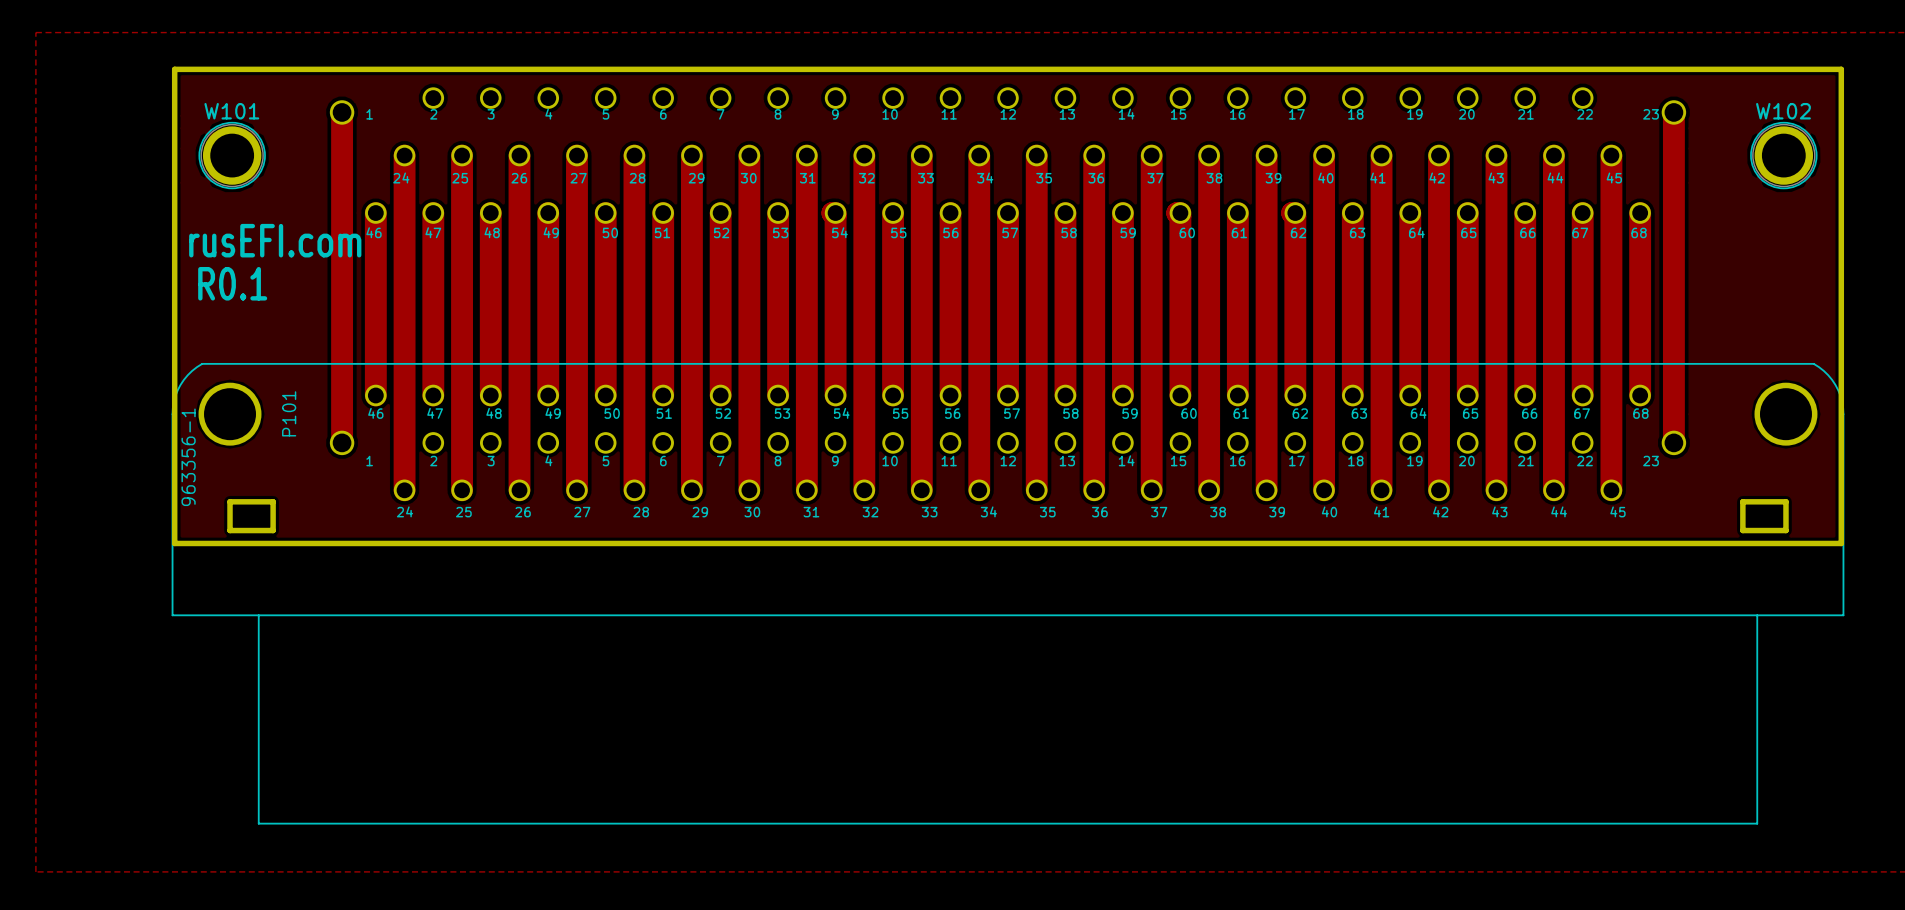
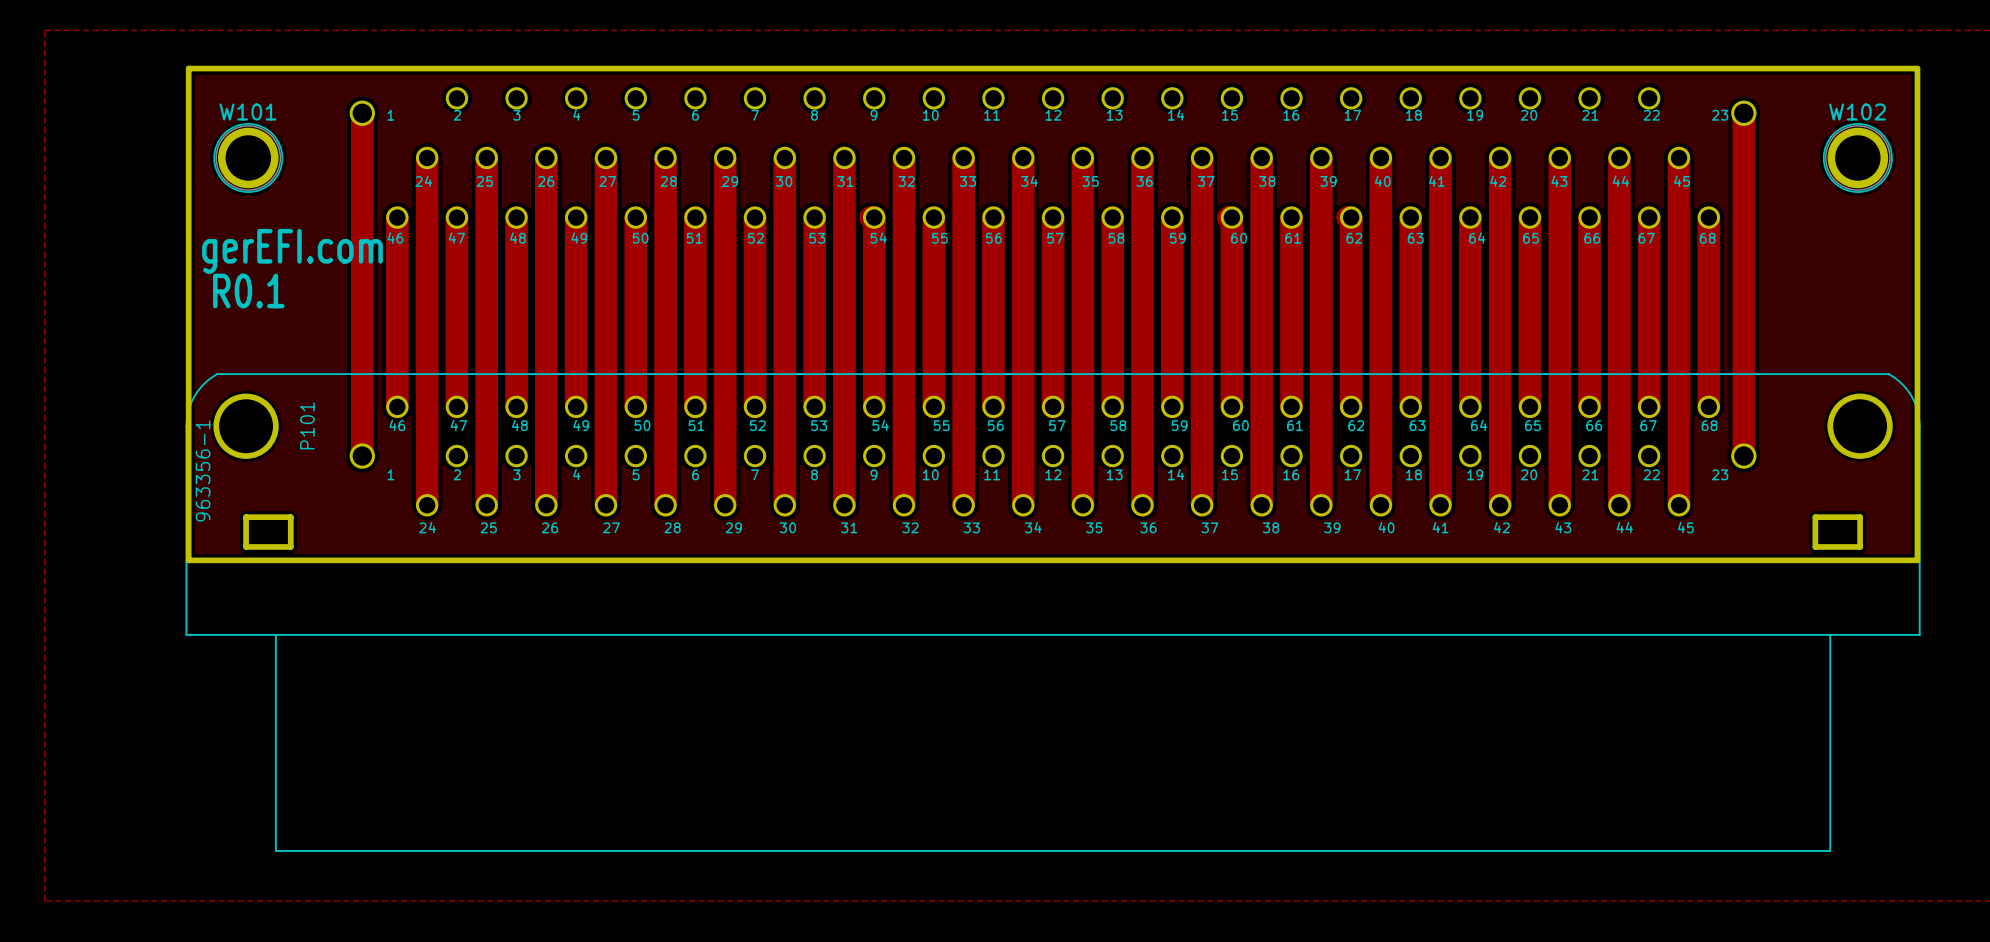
text: rusEFI.com (275, 240) -> gerEFI.com (292, 251)

